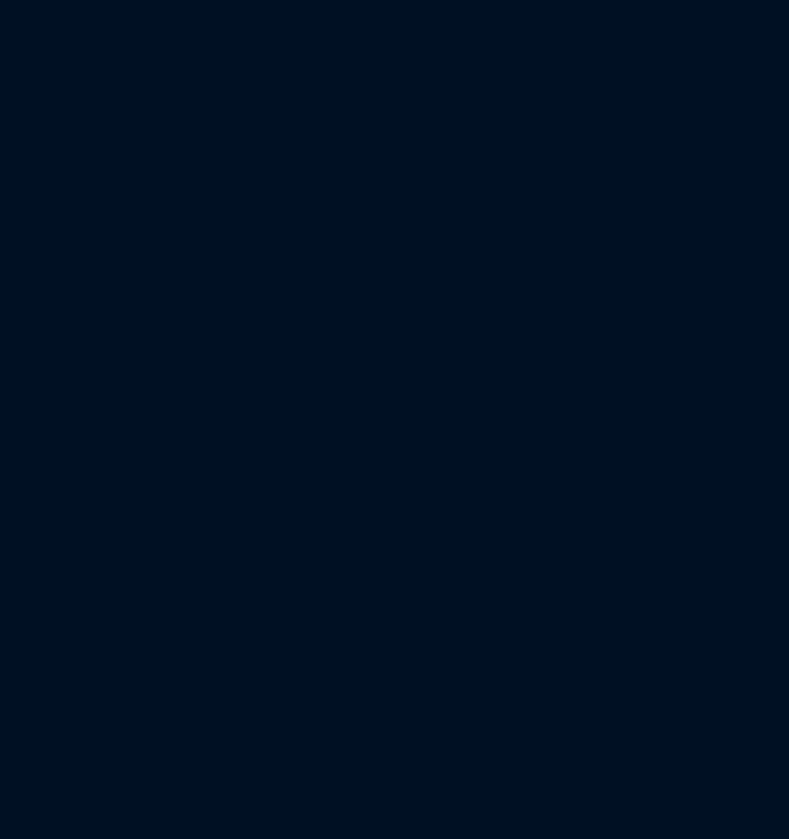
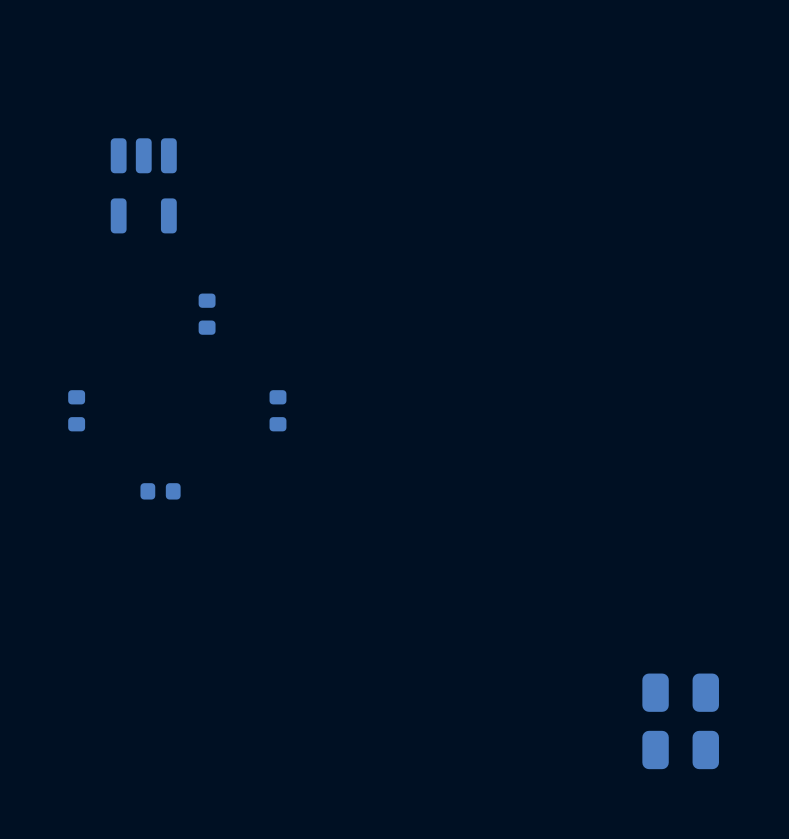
part: none -> (143, 185)
part: none -> (207, 314)
part: none -> (76, 410)
part: none -> (277, 410)
part: none -> (160, 491)
part: none -> (680, 692)
part: none -> (680, 749)

